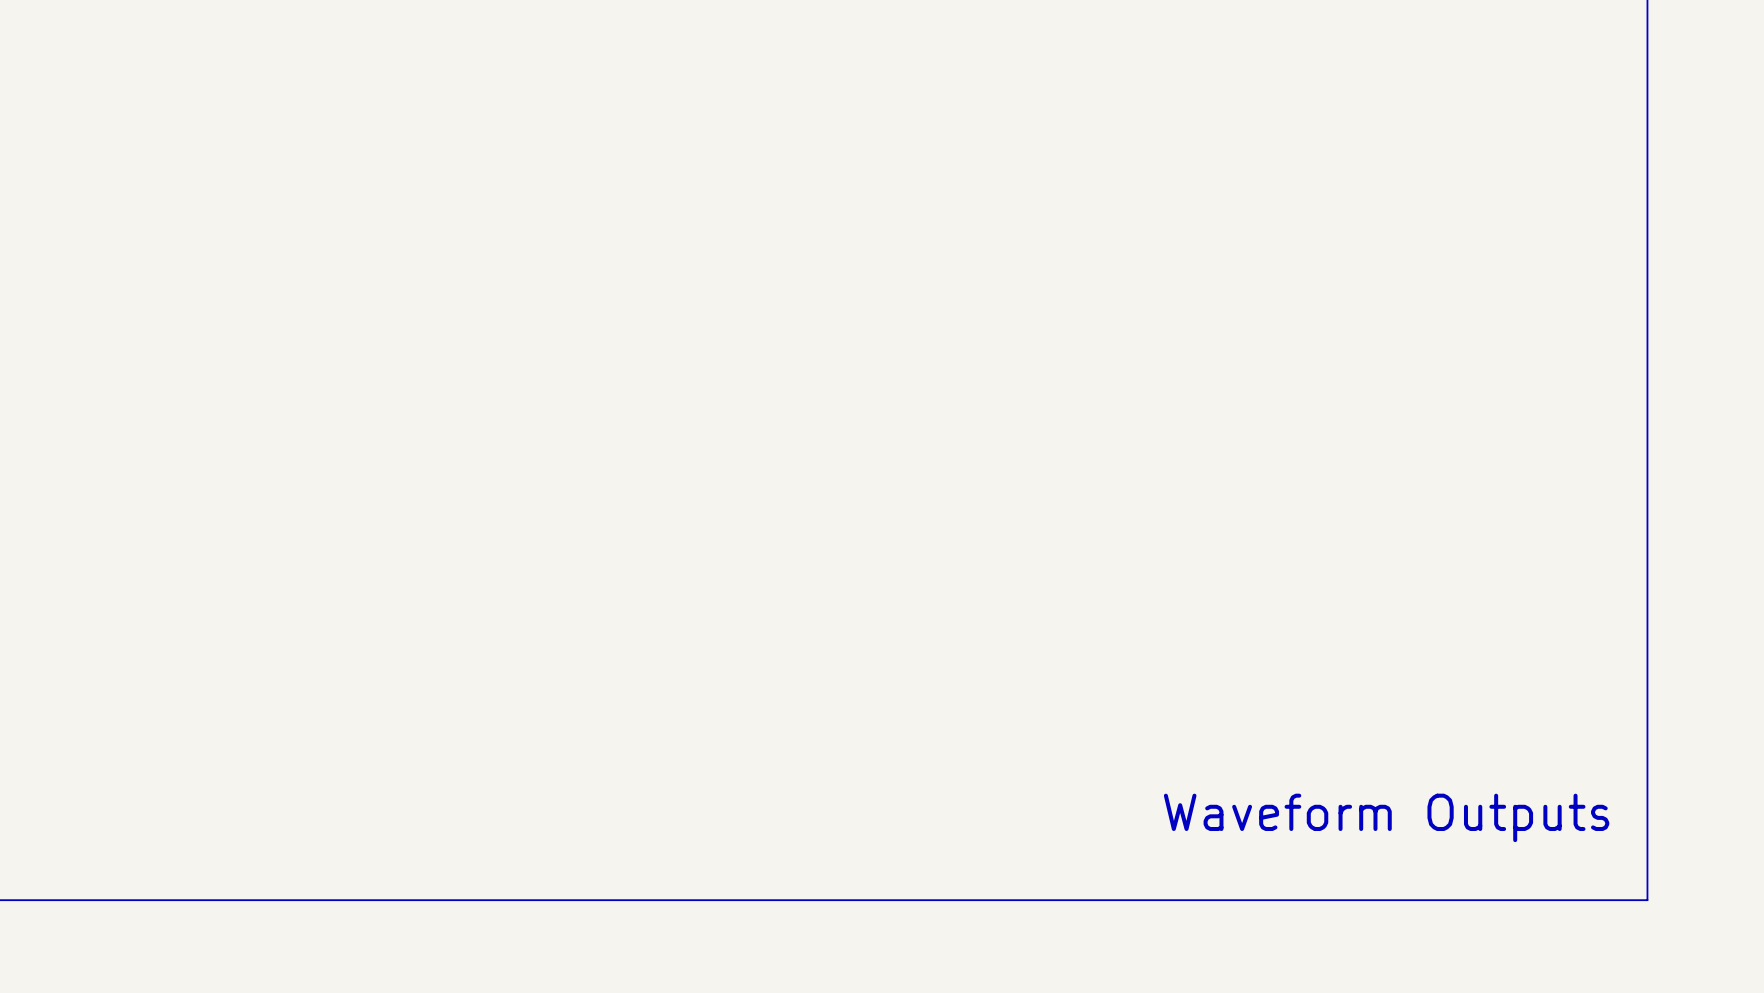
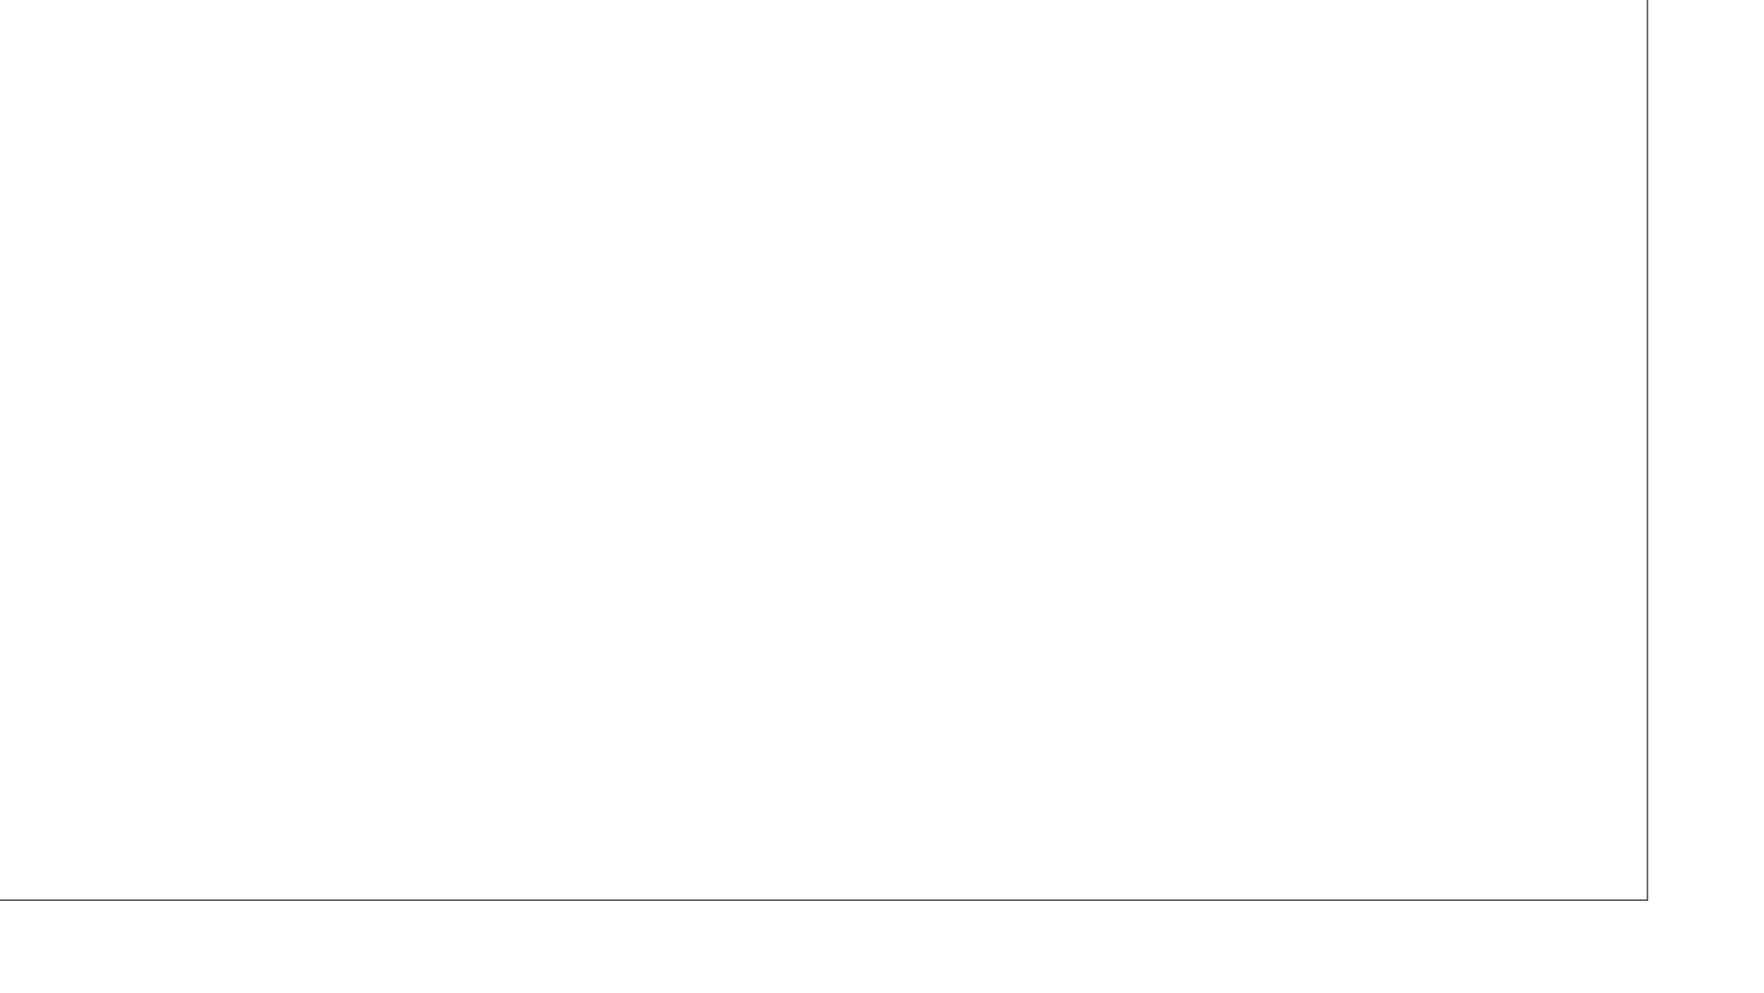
text: Waveform Outputs (1386, 817) -> none

